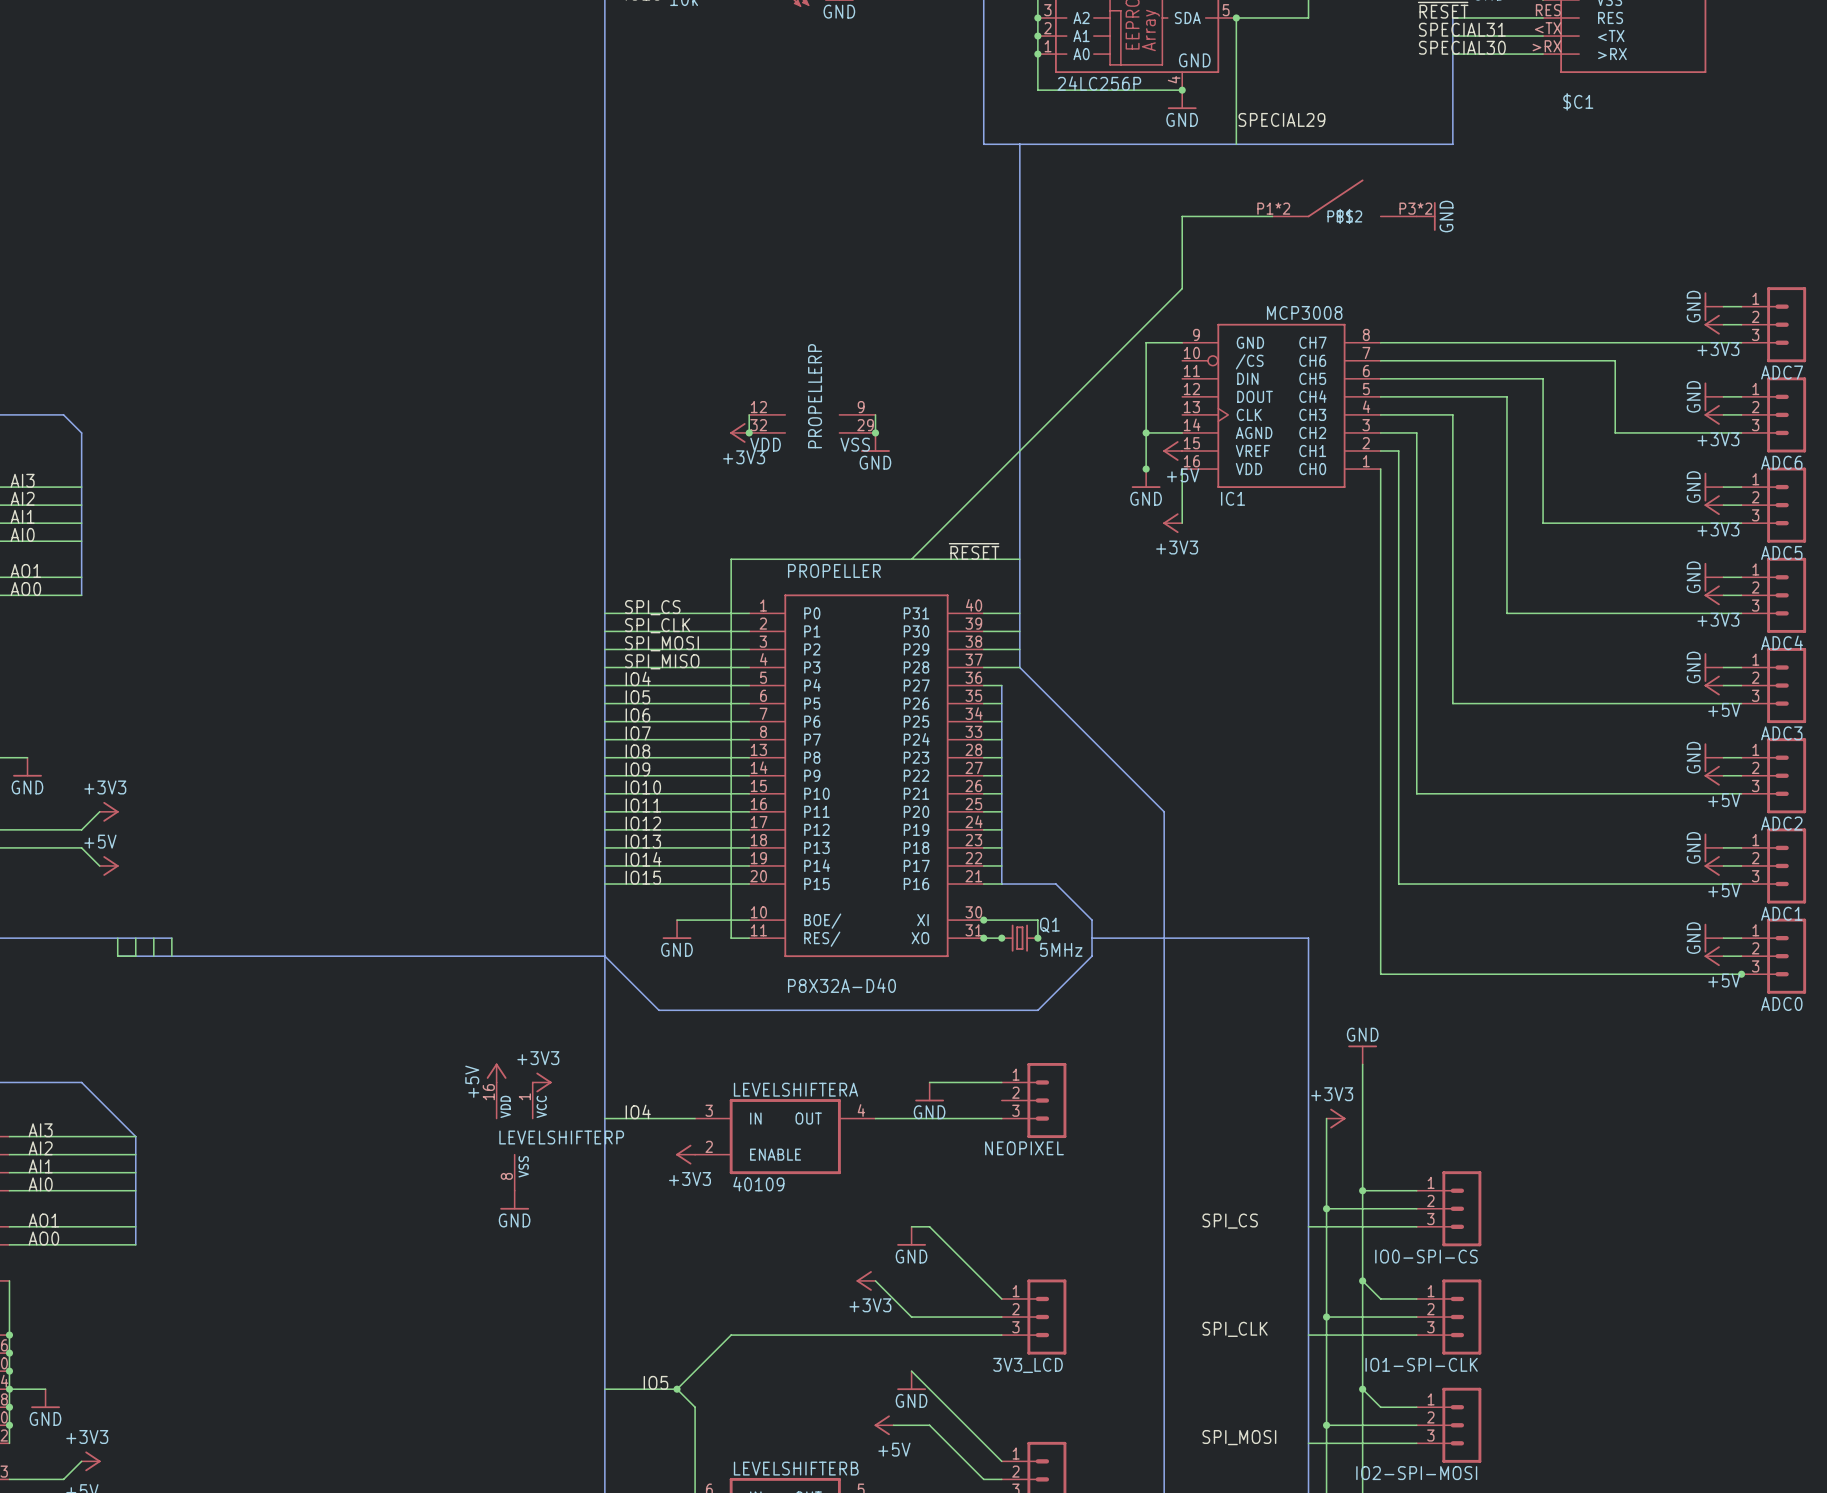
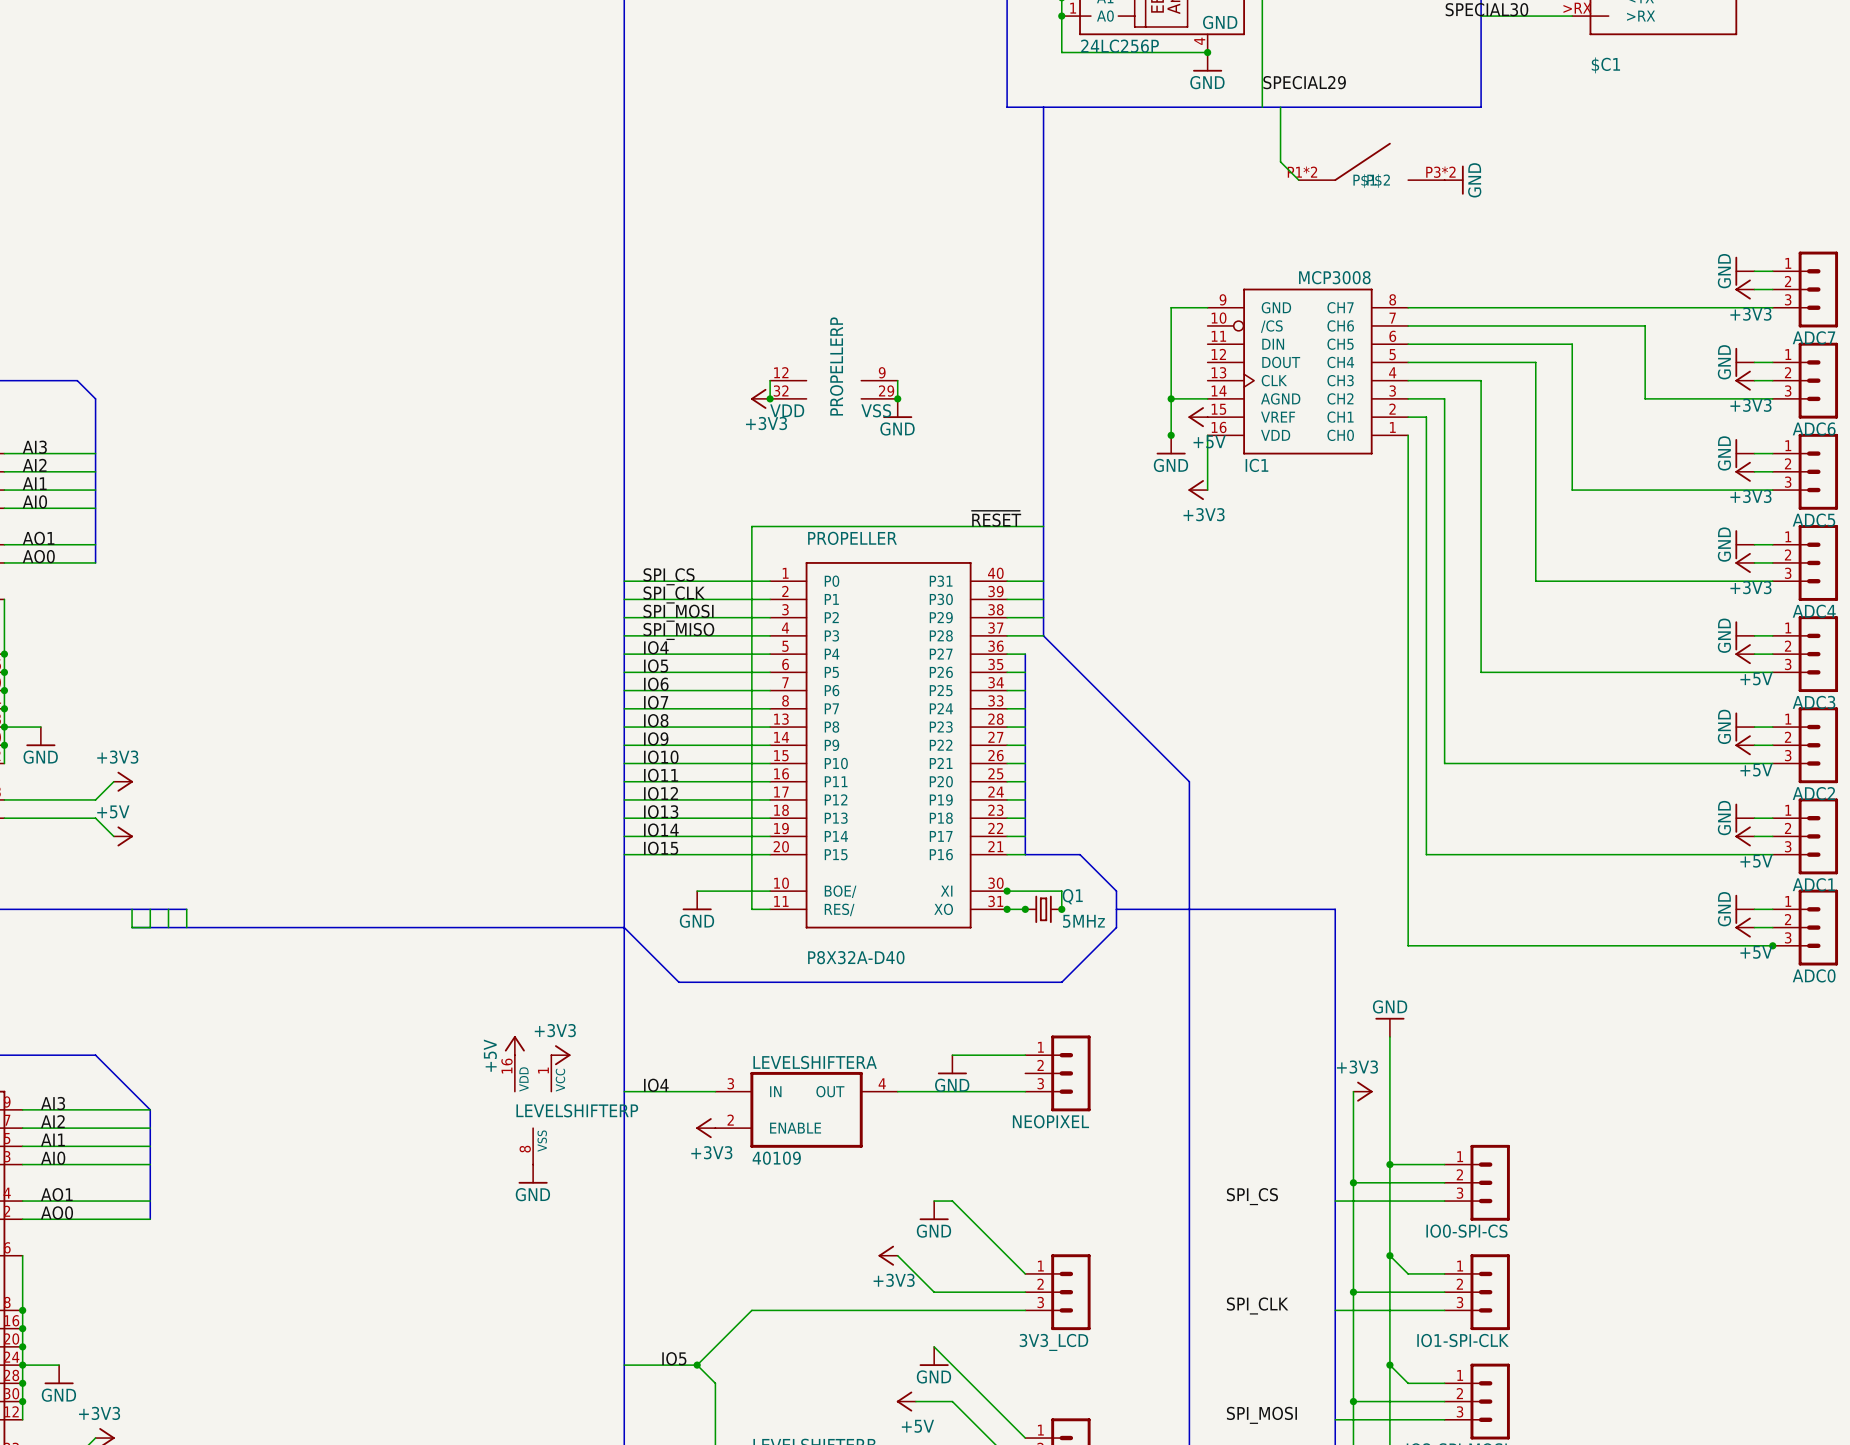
wire: (1272, 216) (1182, 216) (1182, 288) (911, 559) -> (1298, 180) (1280, 161) (1280, 107)

